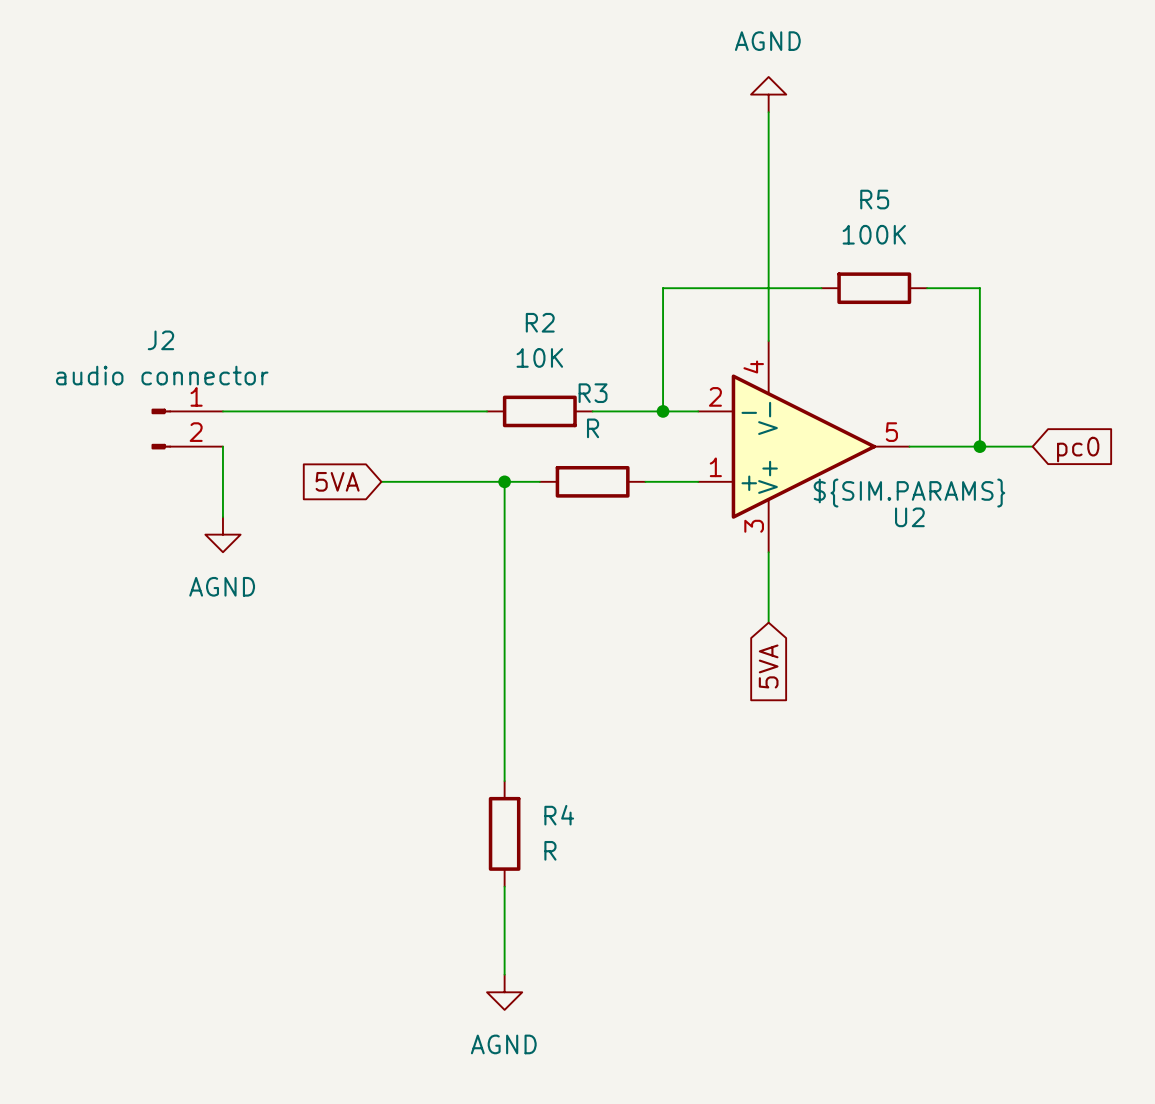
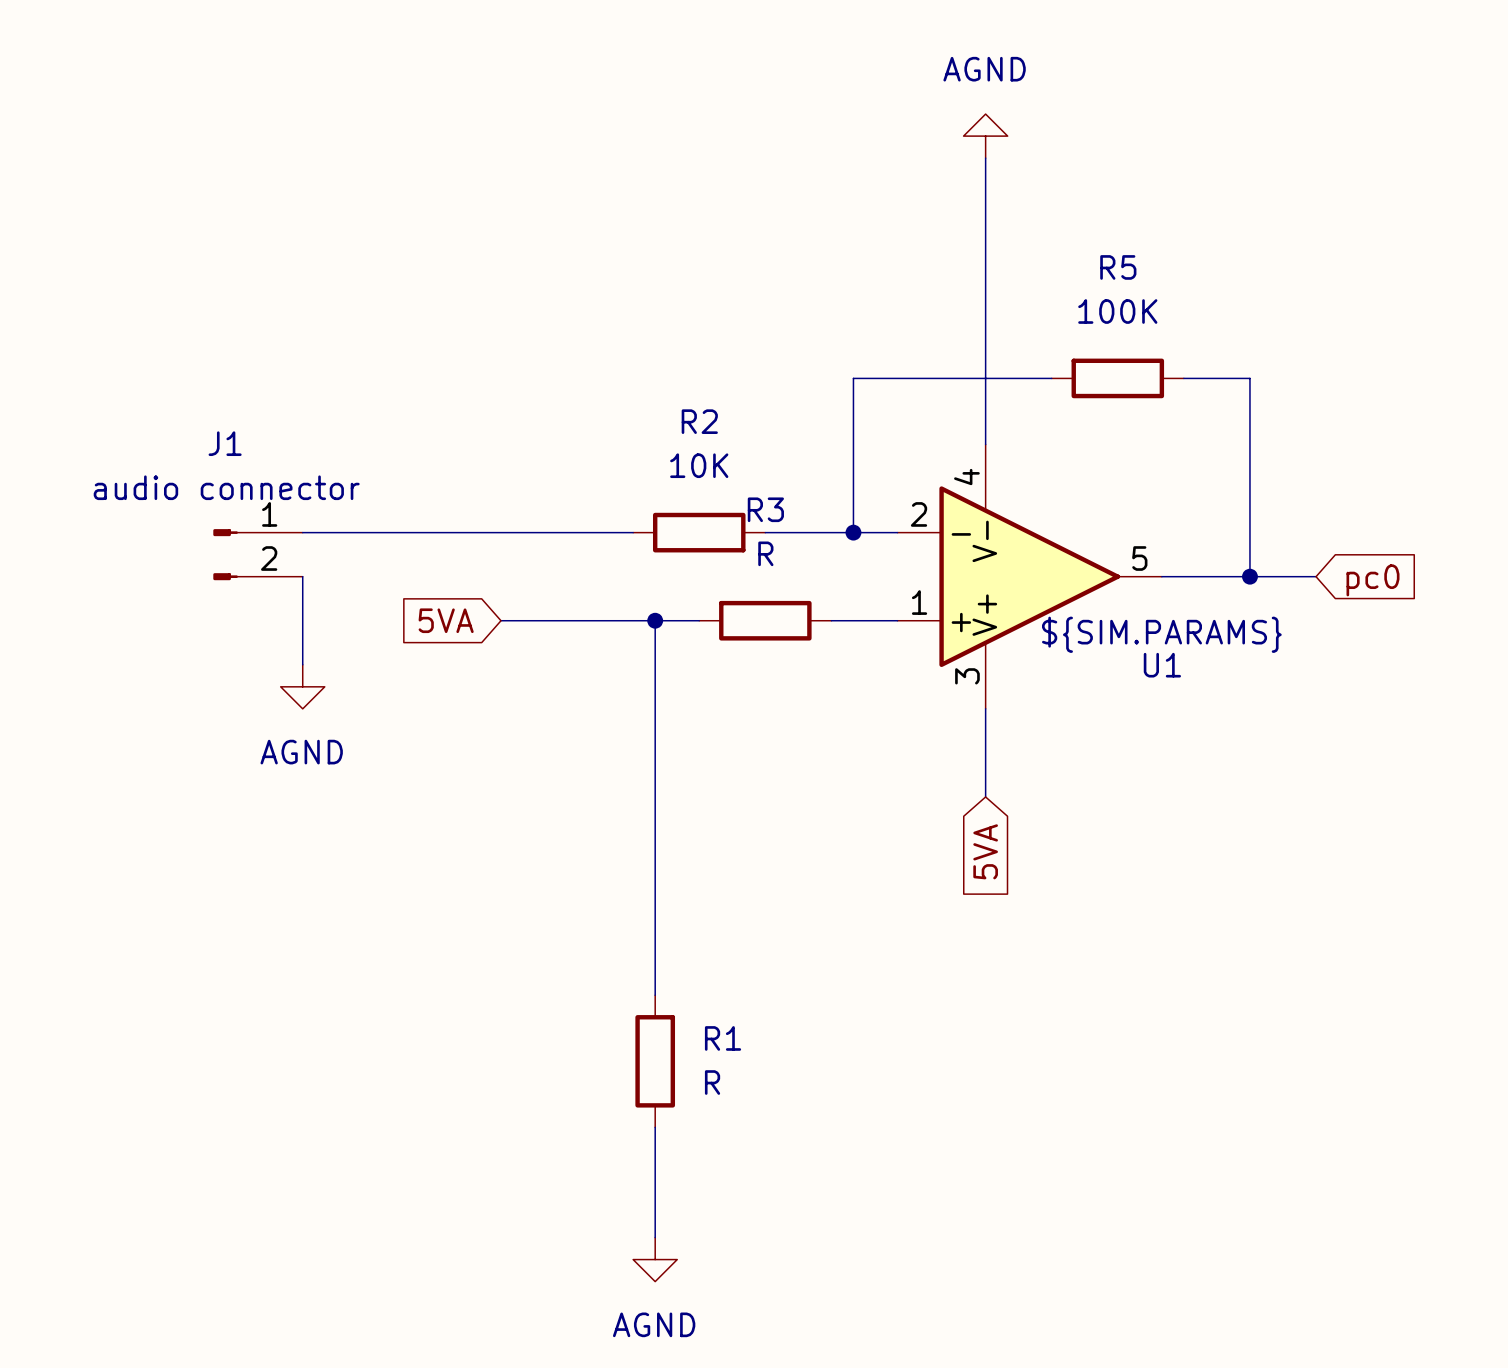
J2 name: J2 (160, 340) -> J1 (225, 443)
U2 name: U2 (909, 517) -> U1 (1162, 665)
R4 name: R4 (559, 815) -> R1 (723, 1038)

